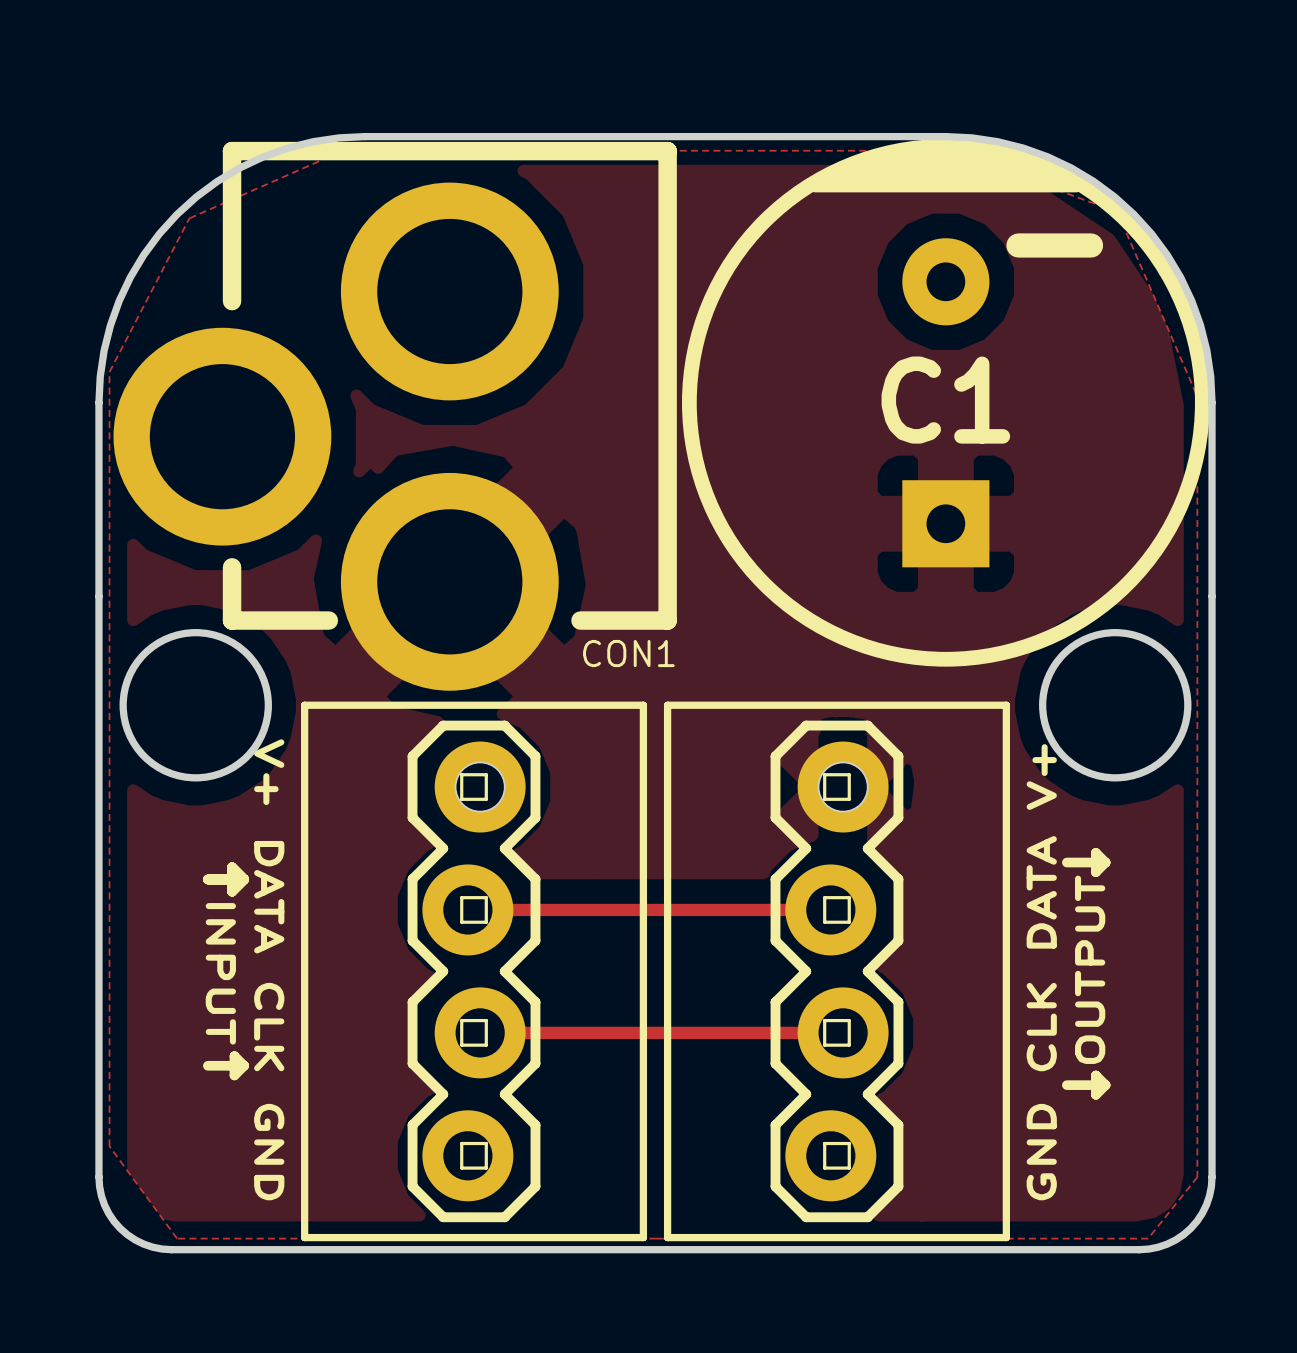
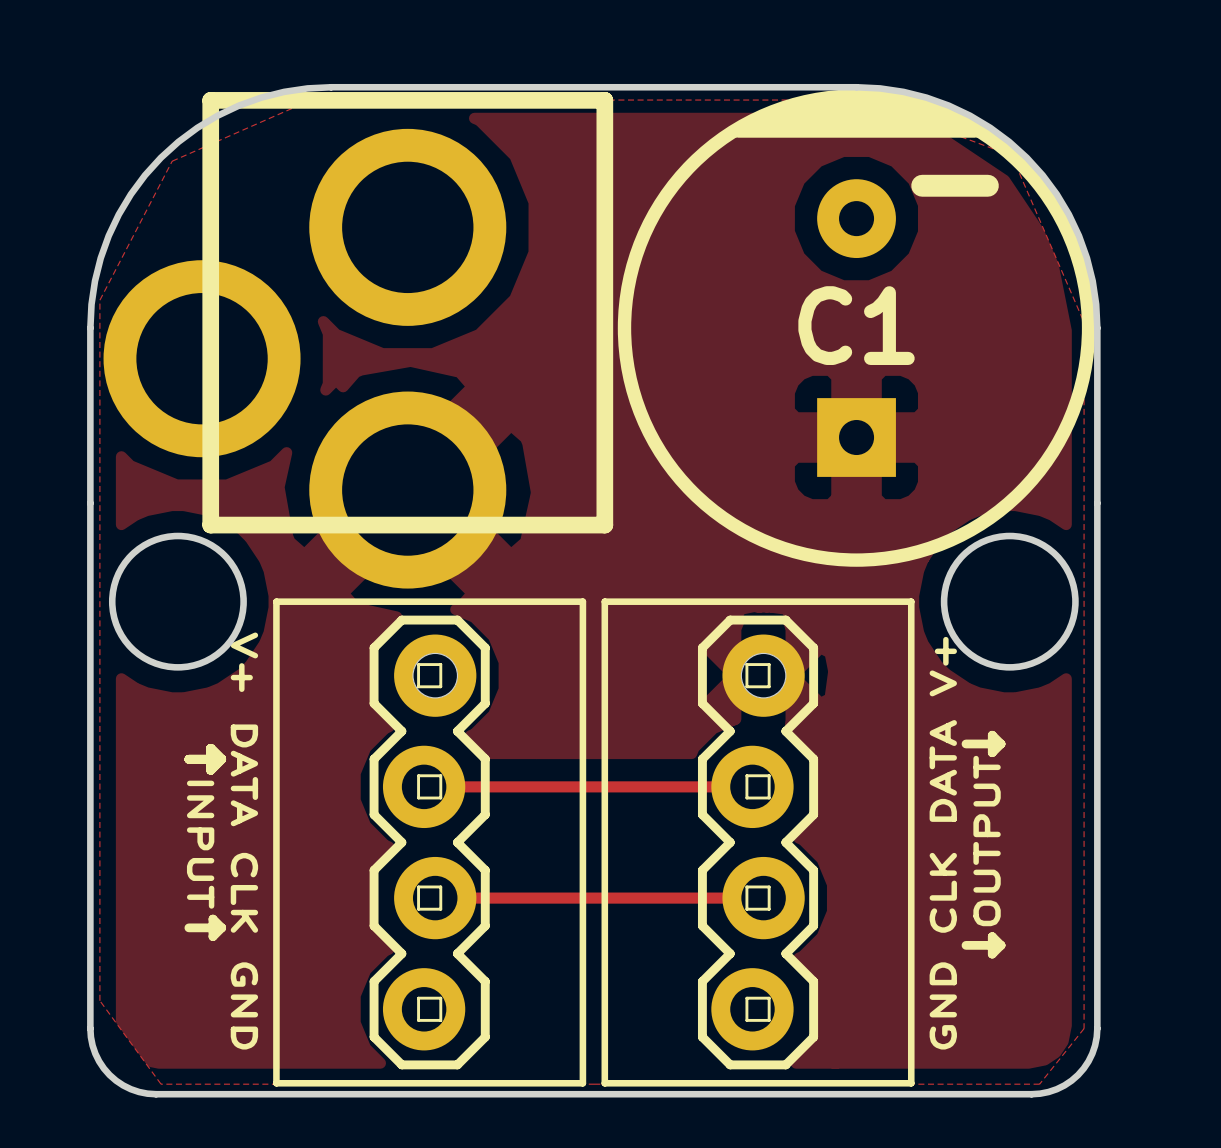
CON1: (395, 416) -> none
part: none -> (358, 340)

